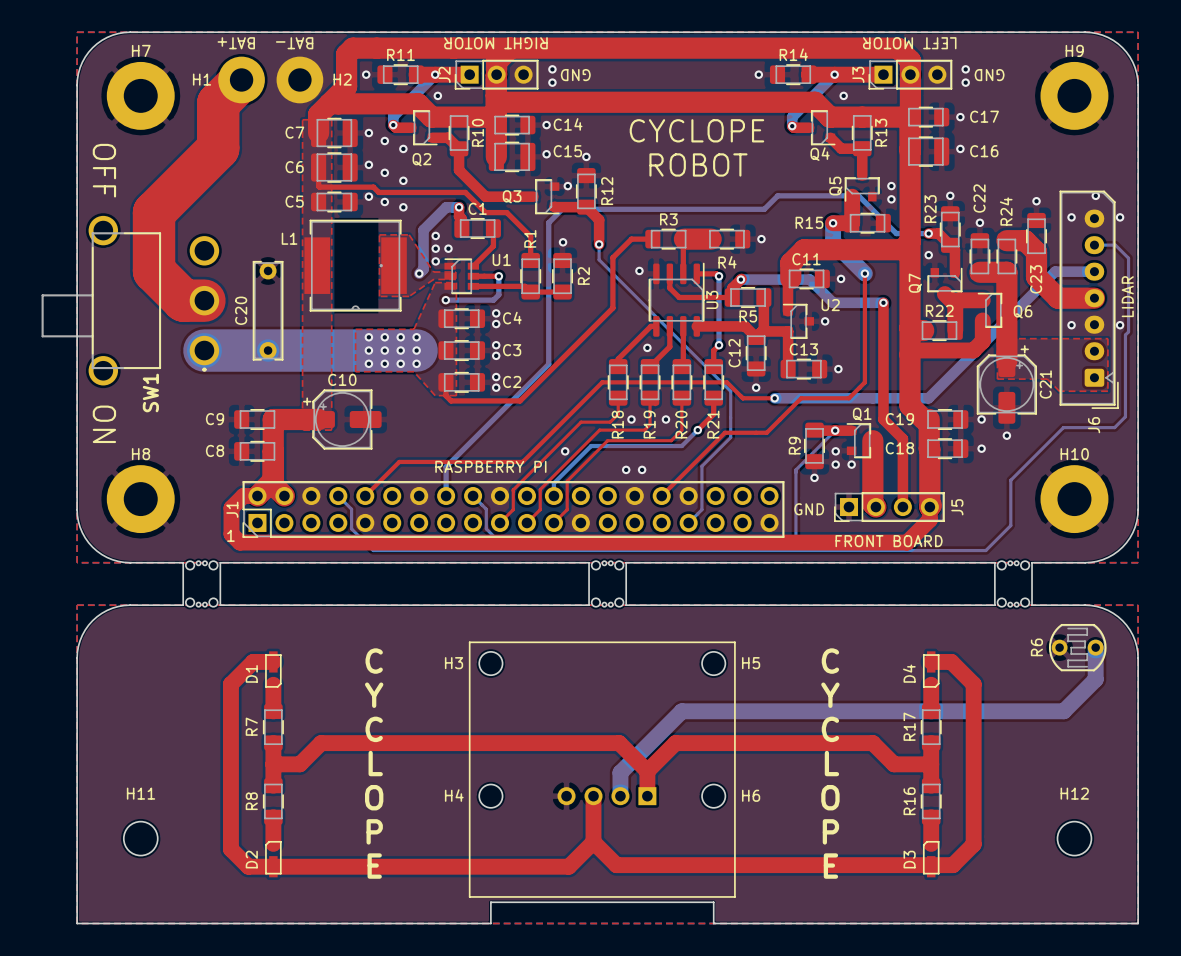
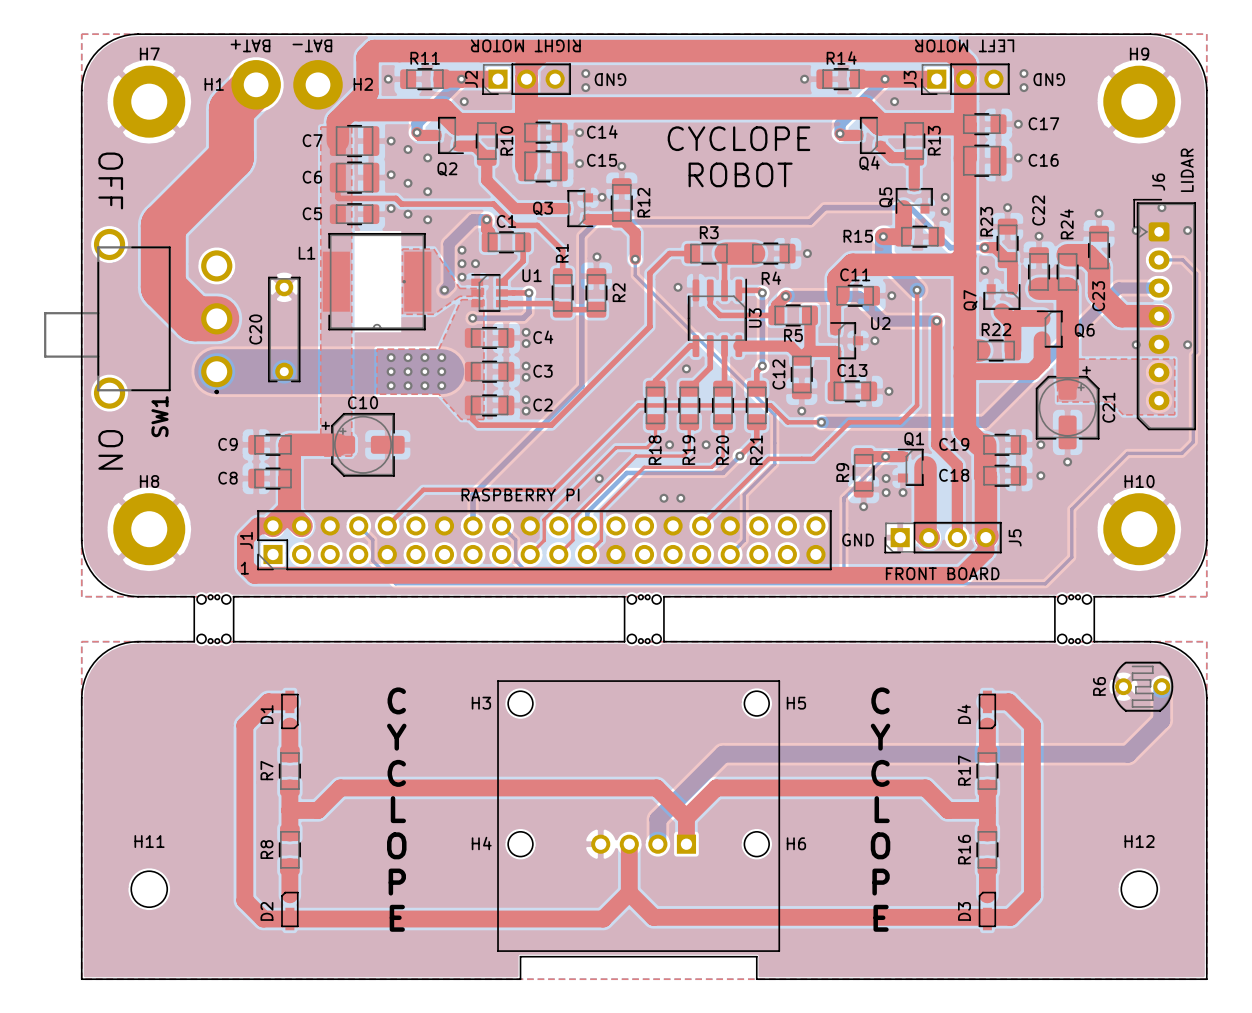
text position: LIDAR (1127, 296) -> LIDAR (1187, 170)
J6 rotation: 0° (1089, 299) -> 180° (1164, 314)

